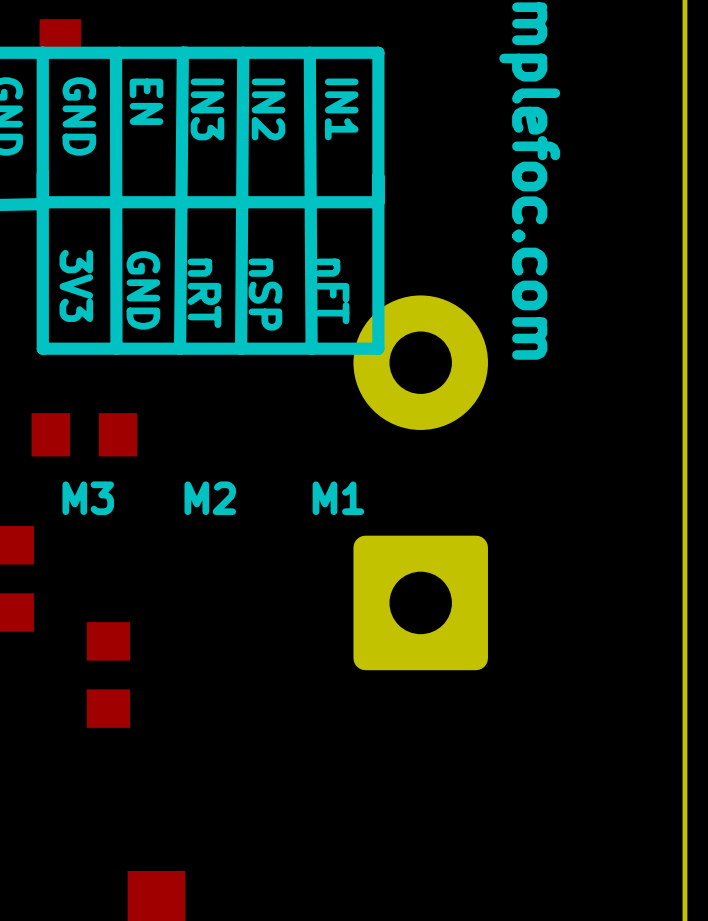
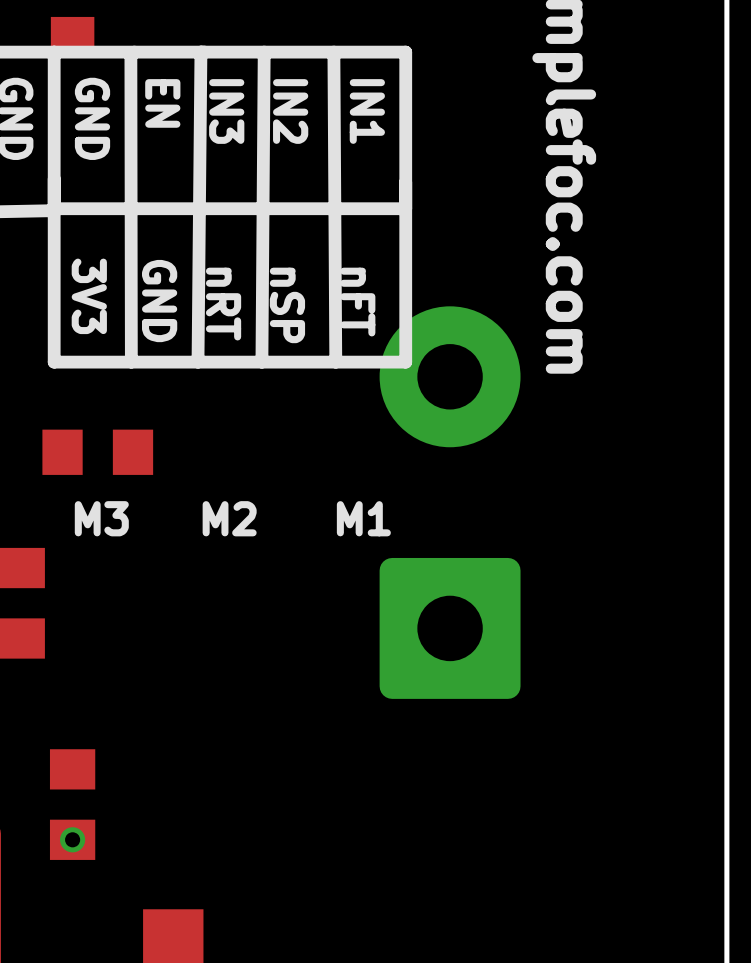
part: (108, 675) -> none
part: none -> (72, 804)
via: none -> (72, 839)

